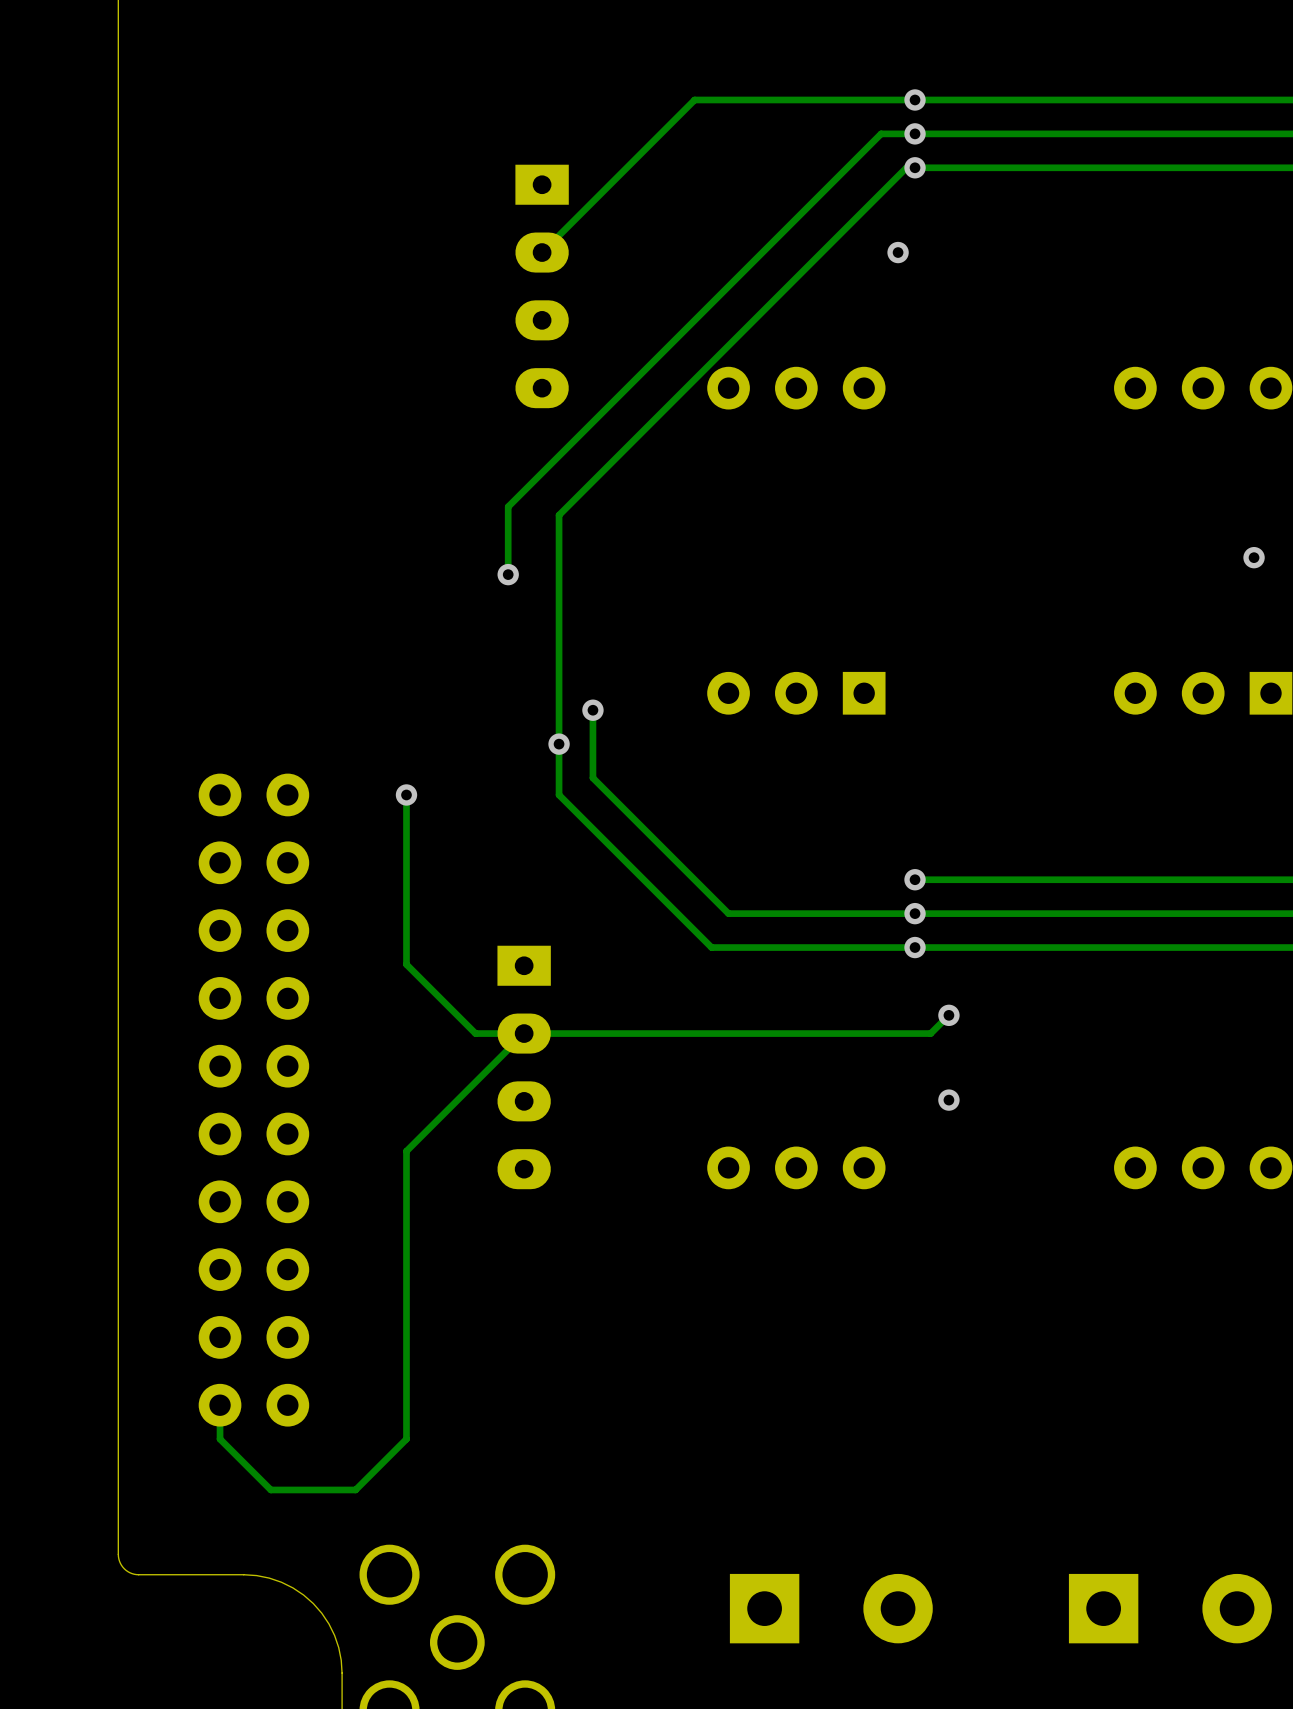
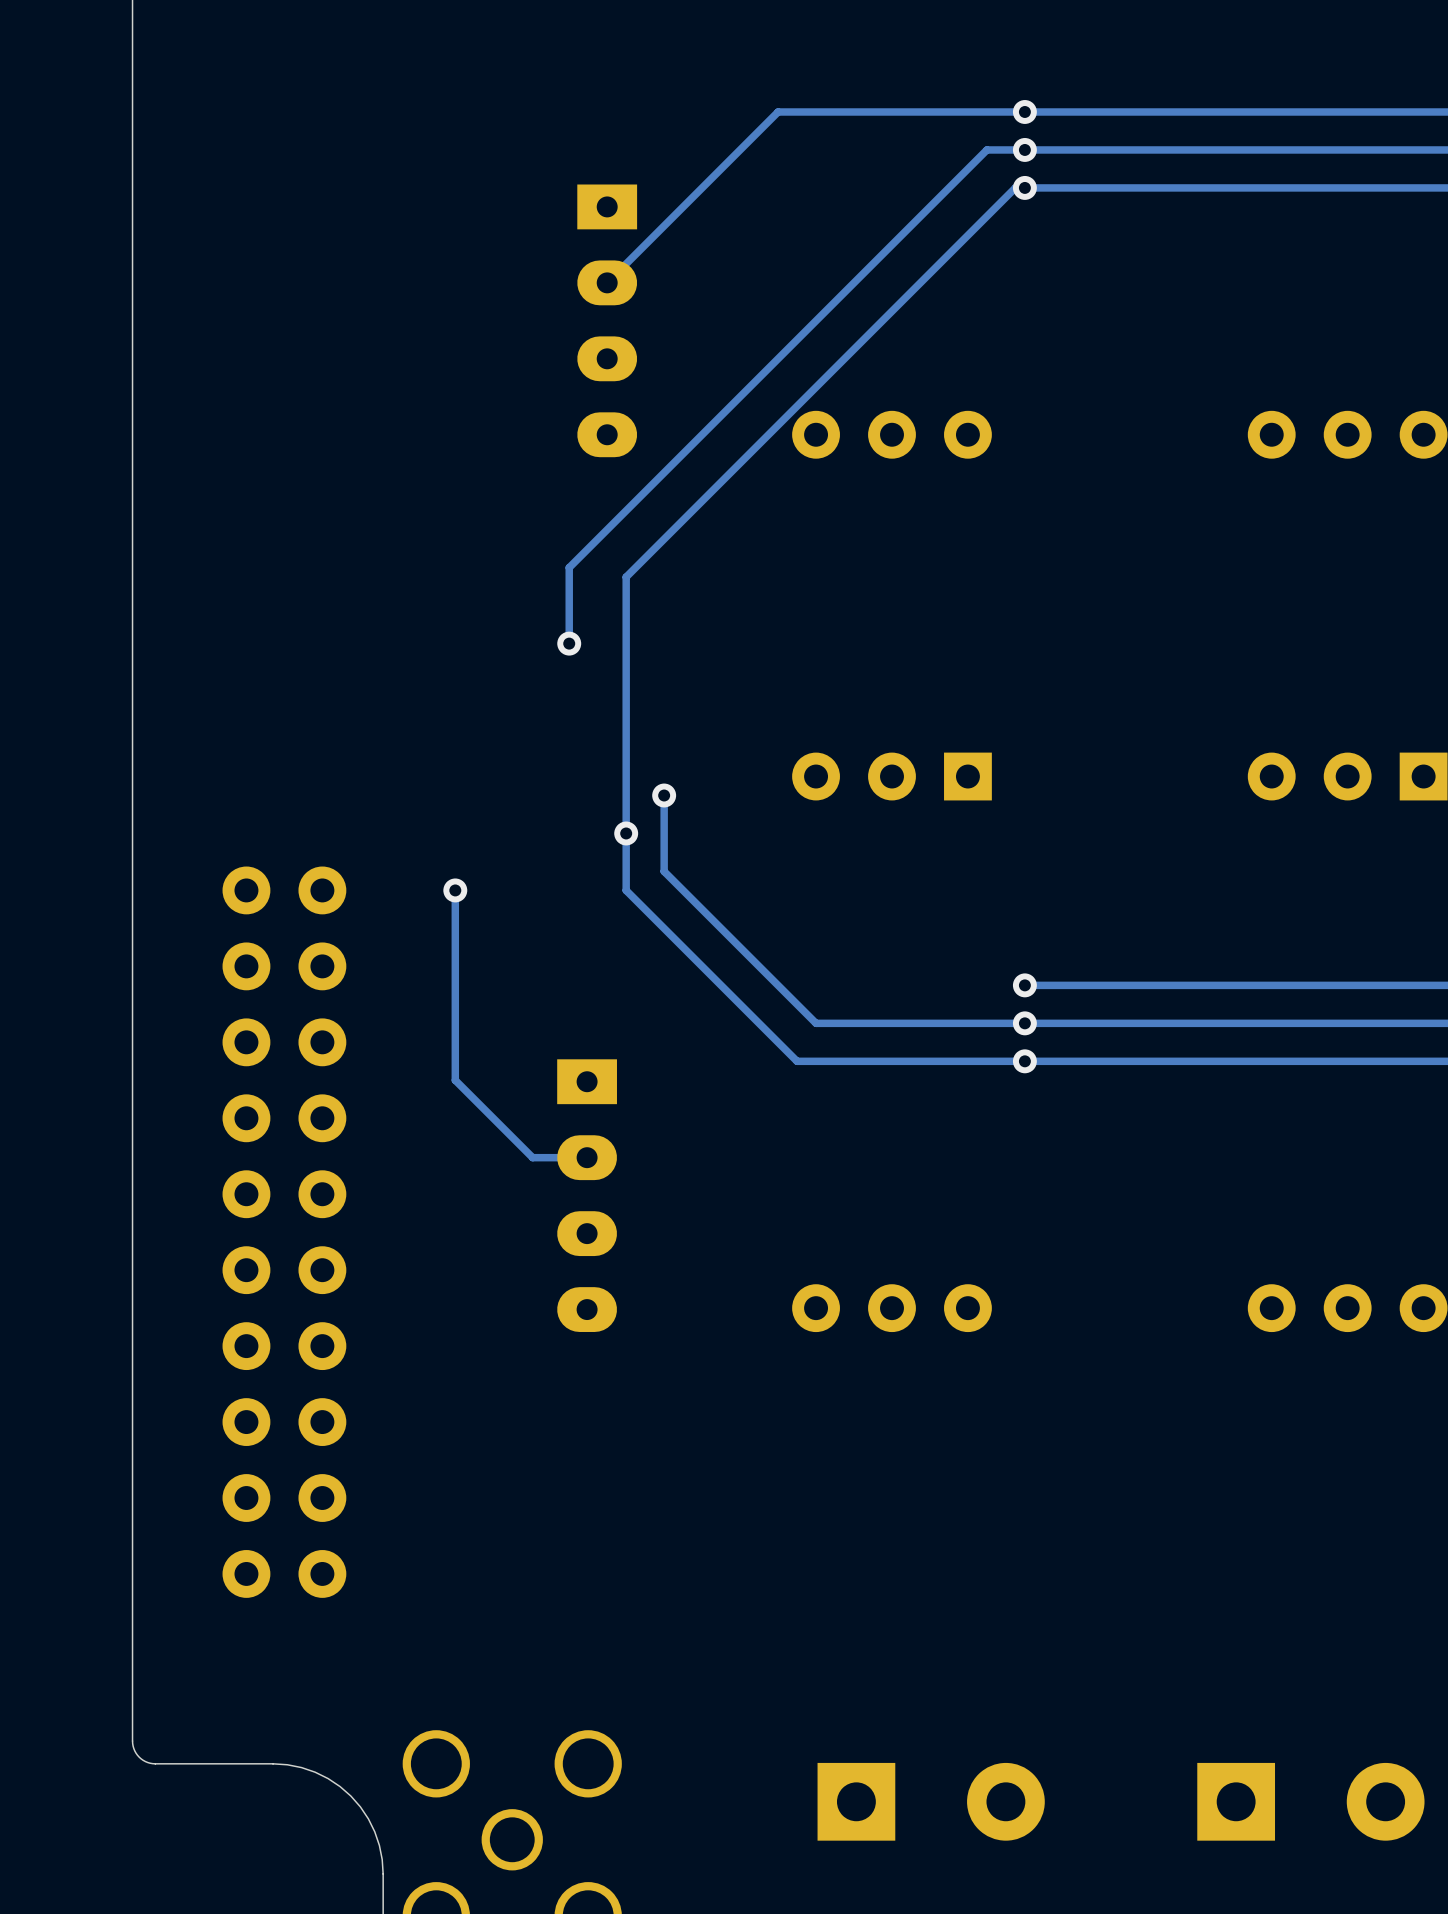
via: (898, 252) -> none
via: (1254, 557) -> none
track: (948, 1015) (930, 1033) (524, 1033) (406, 1151) (406, 1439) (355, 1489) (270, 1489) (220, 1439) (220, 1405) -> none
via: (948, 1015) -> none
via: (948, 1100) -> none

